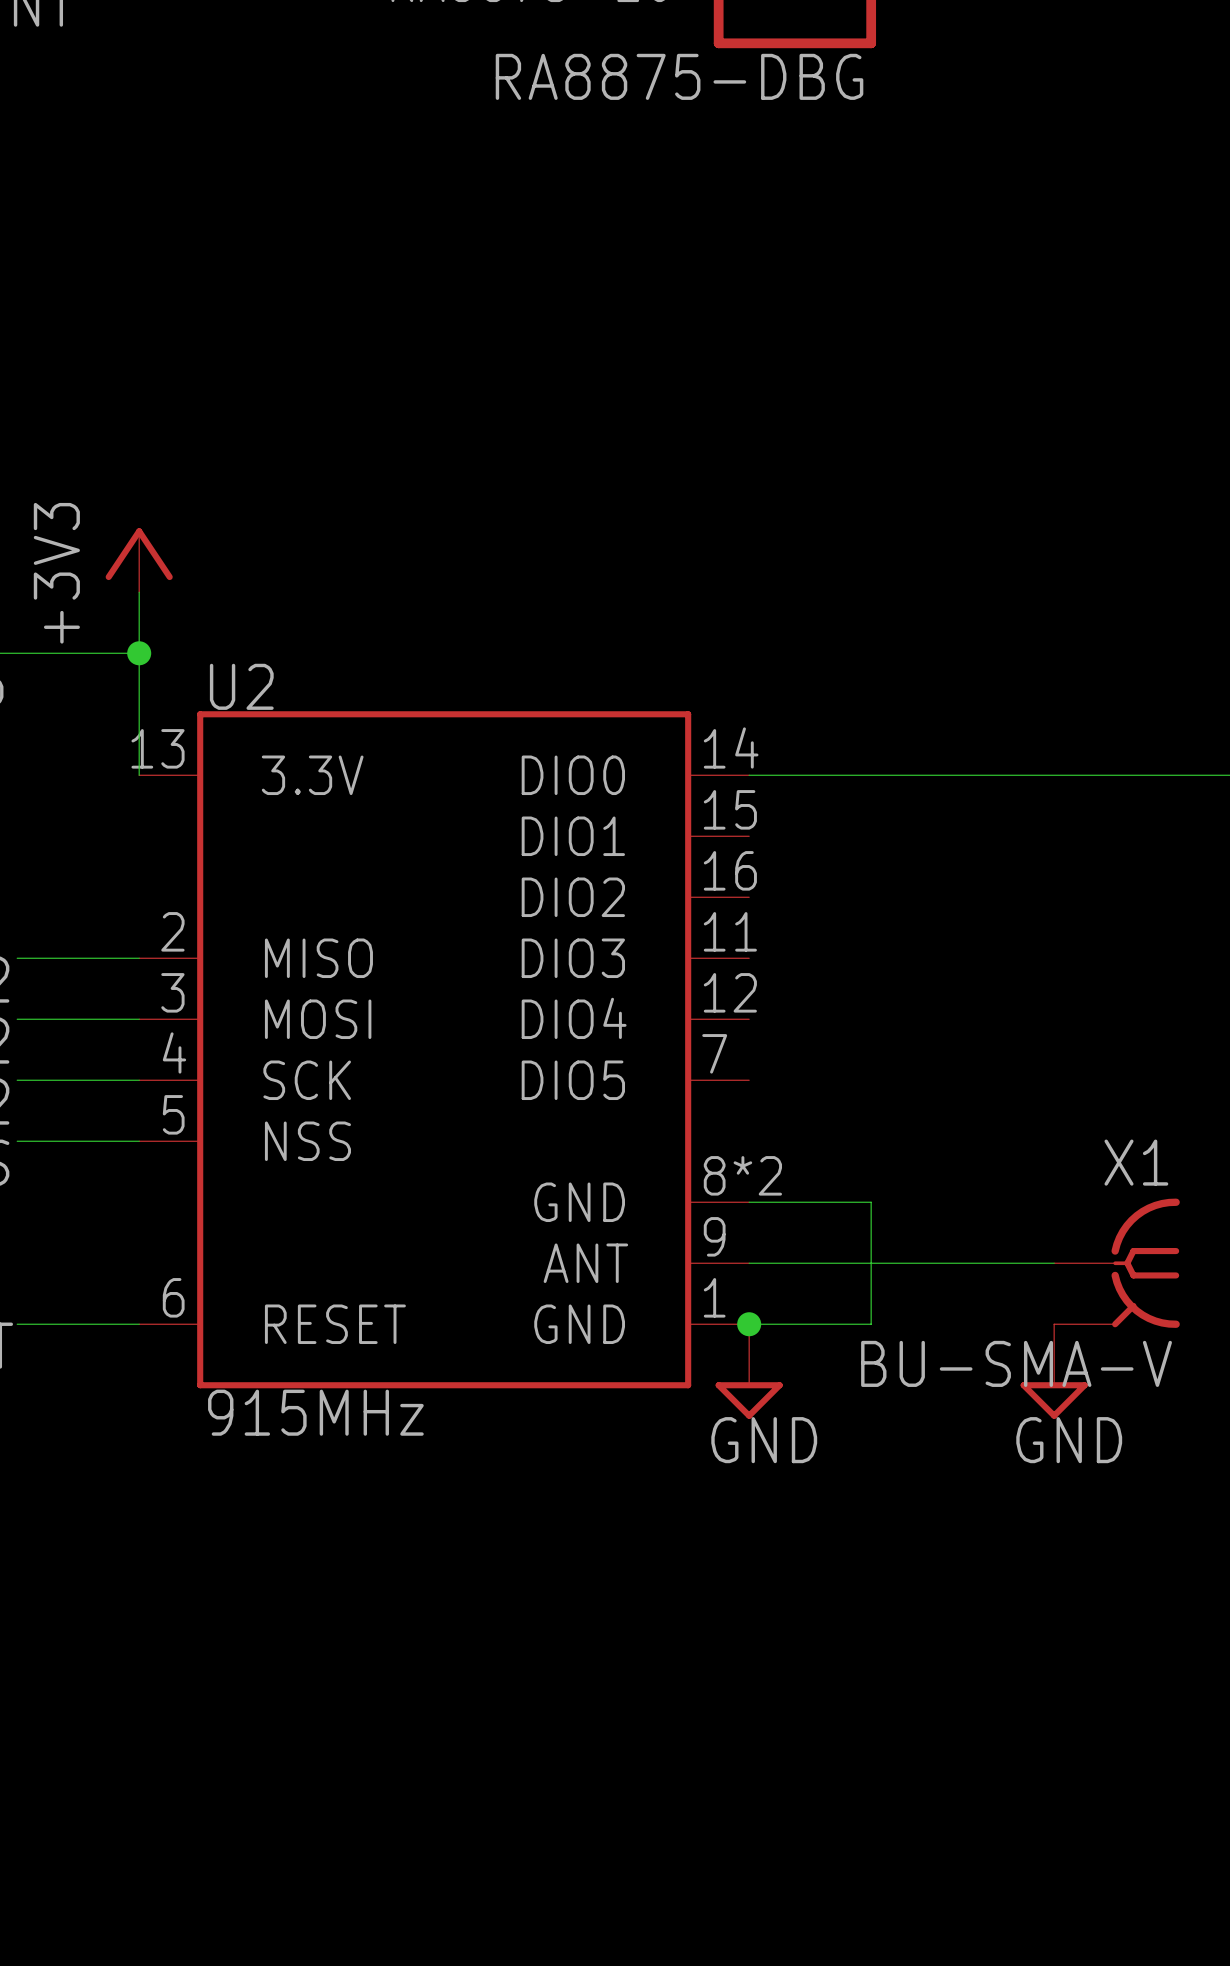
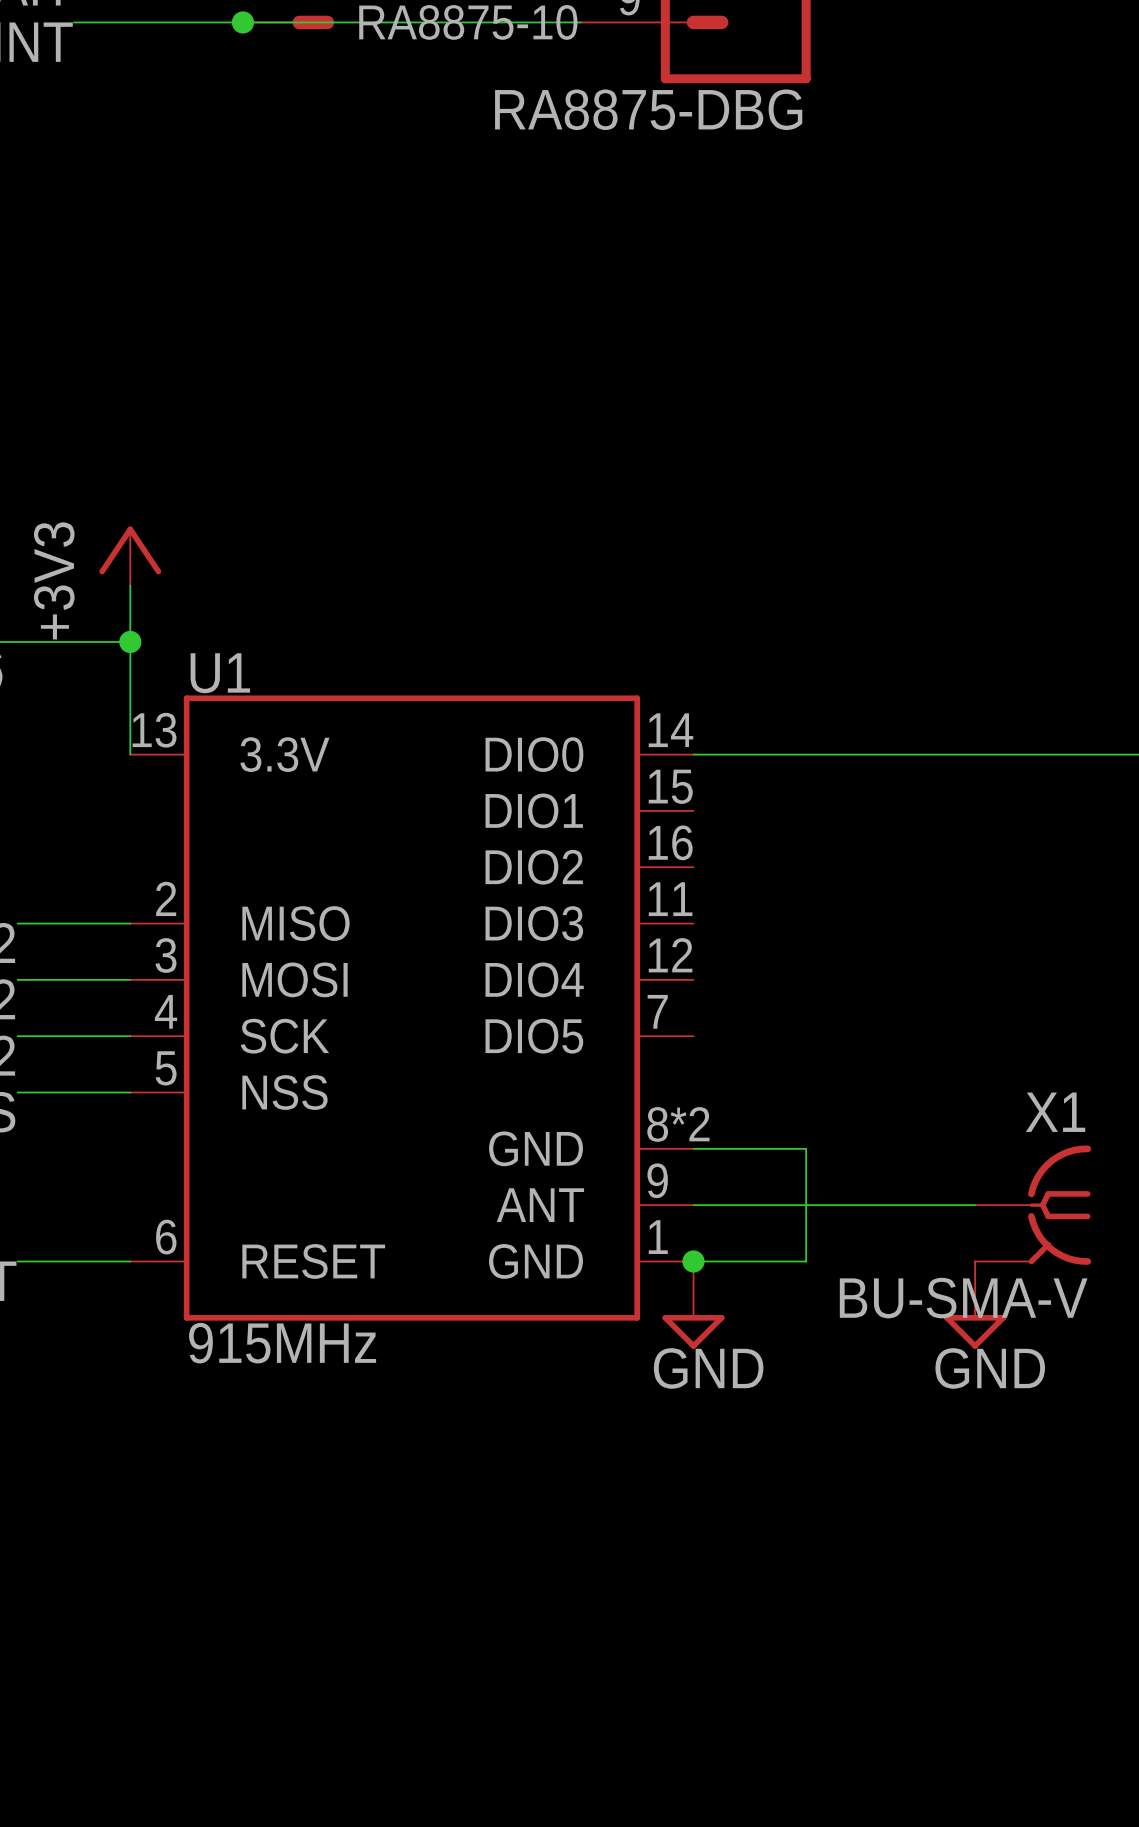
U2 name: U2 (241, 686) -> U1 (220, 673)

